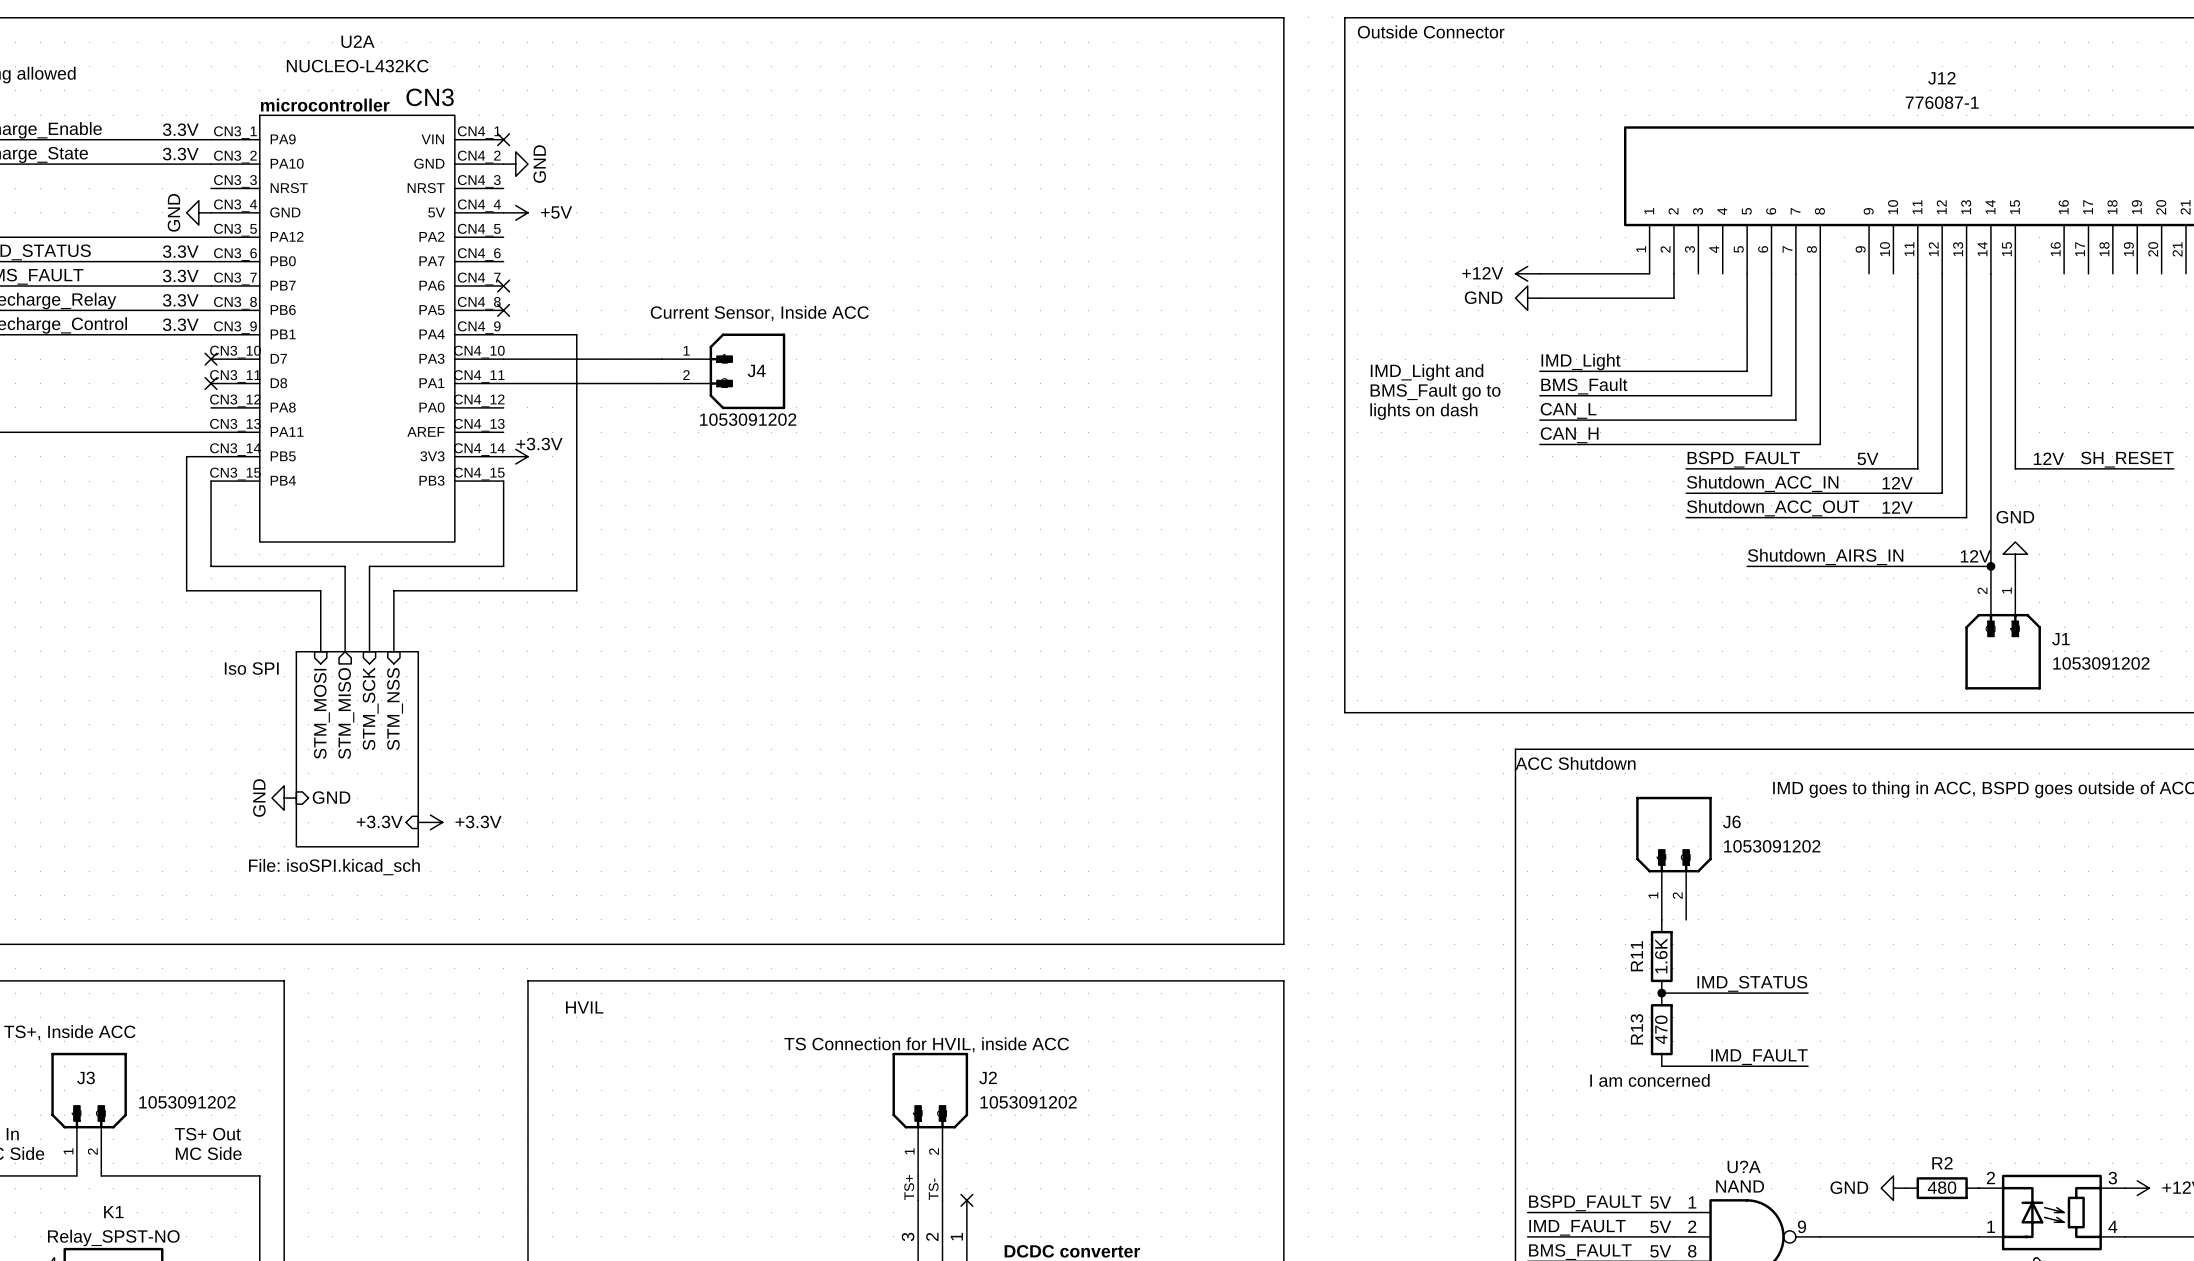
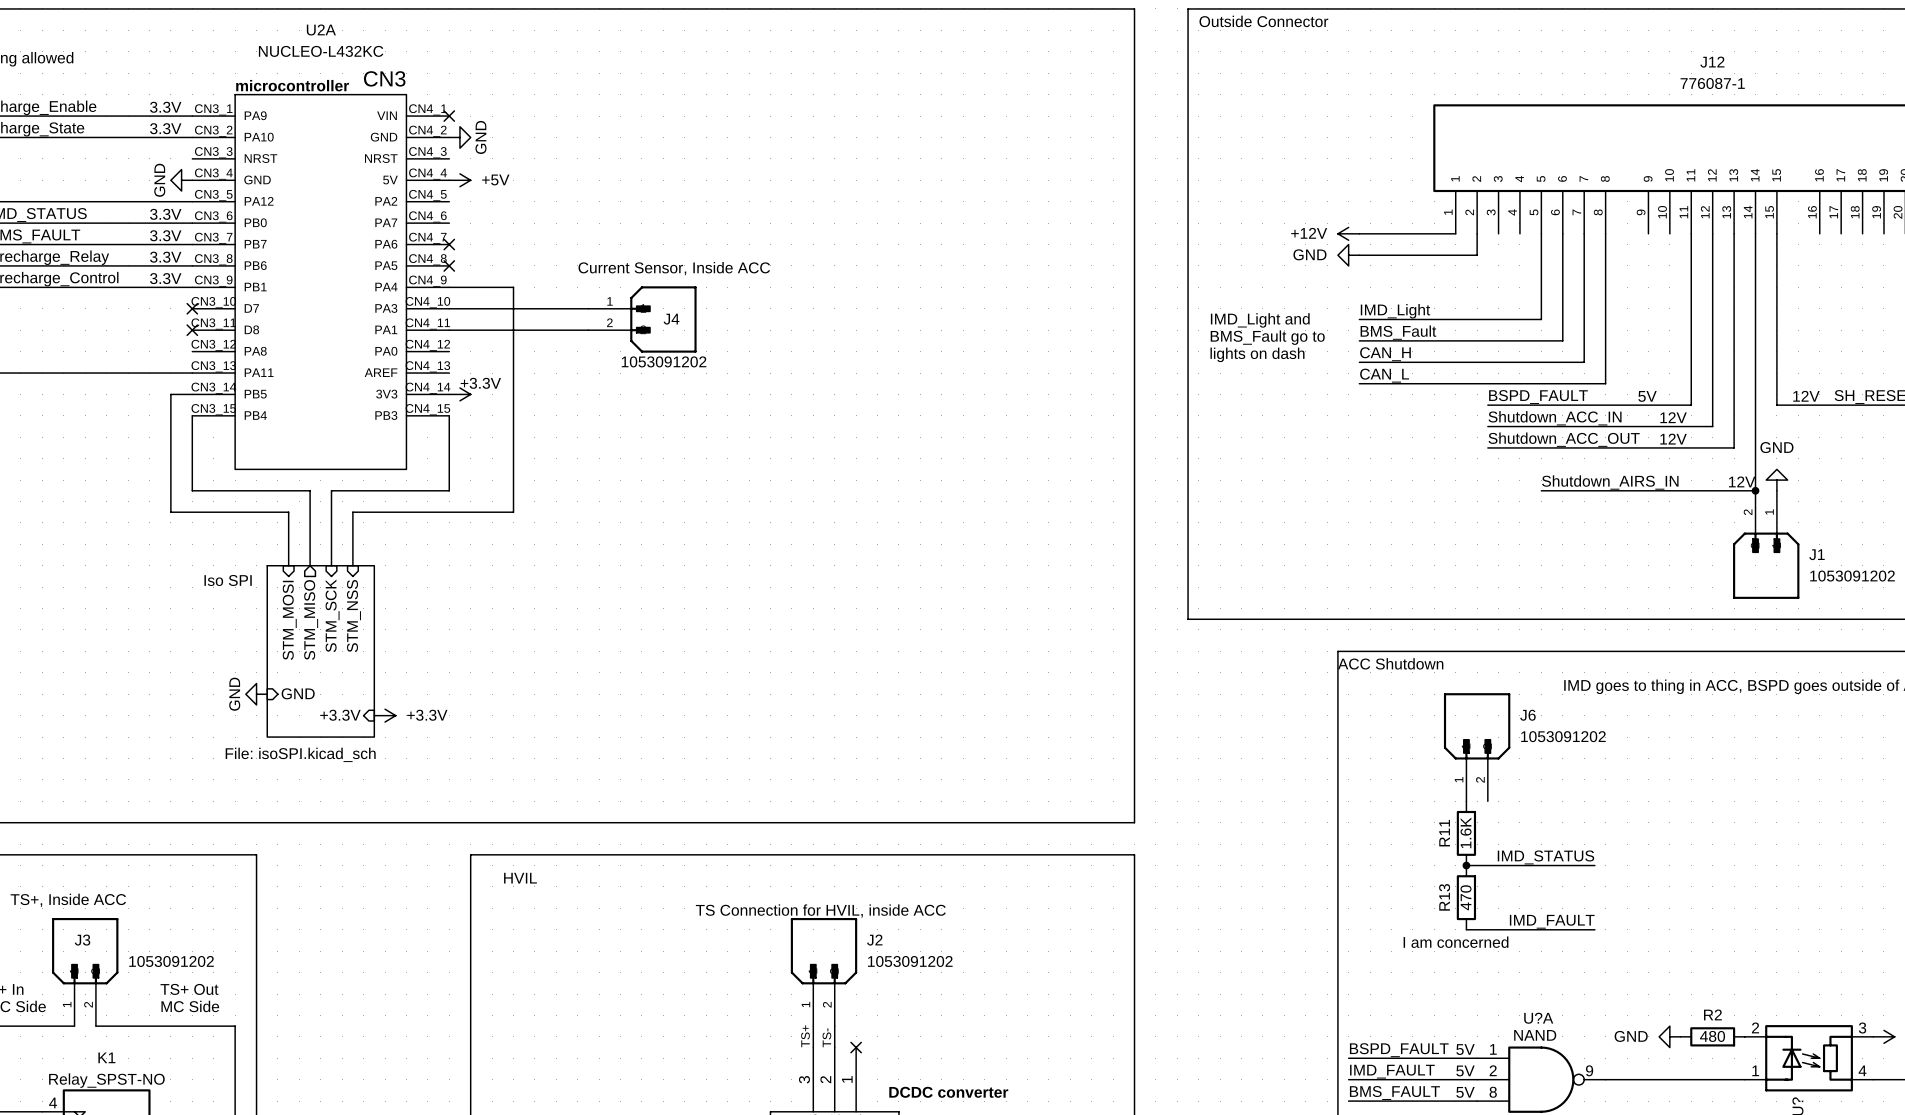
label: CAN_L (1568, 410) -> CAN_H (1385, 354)
label: CAN_H (1569, 435) -> CAN_L (1384, 375)

